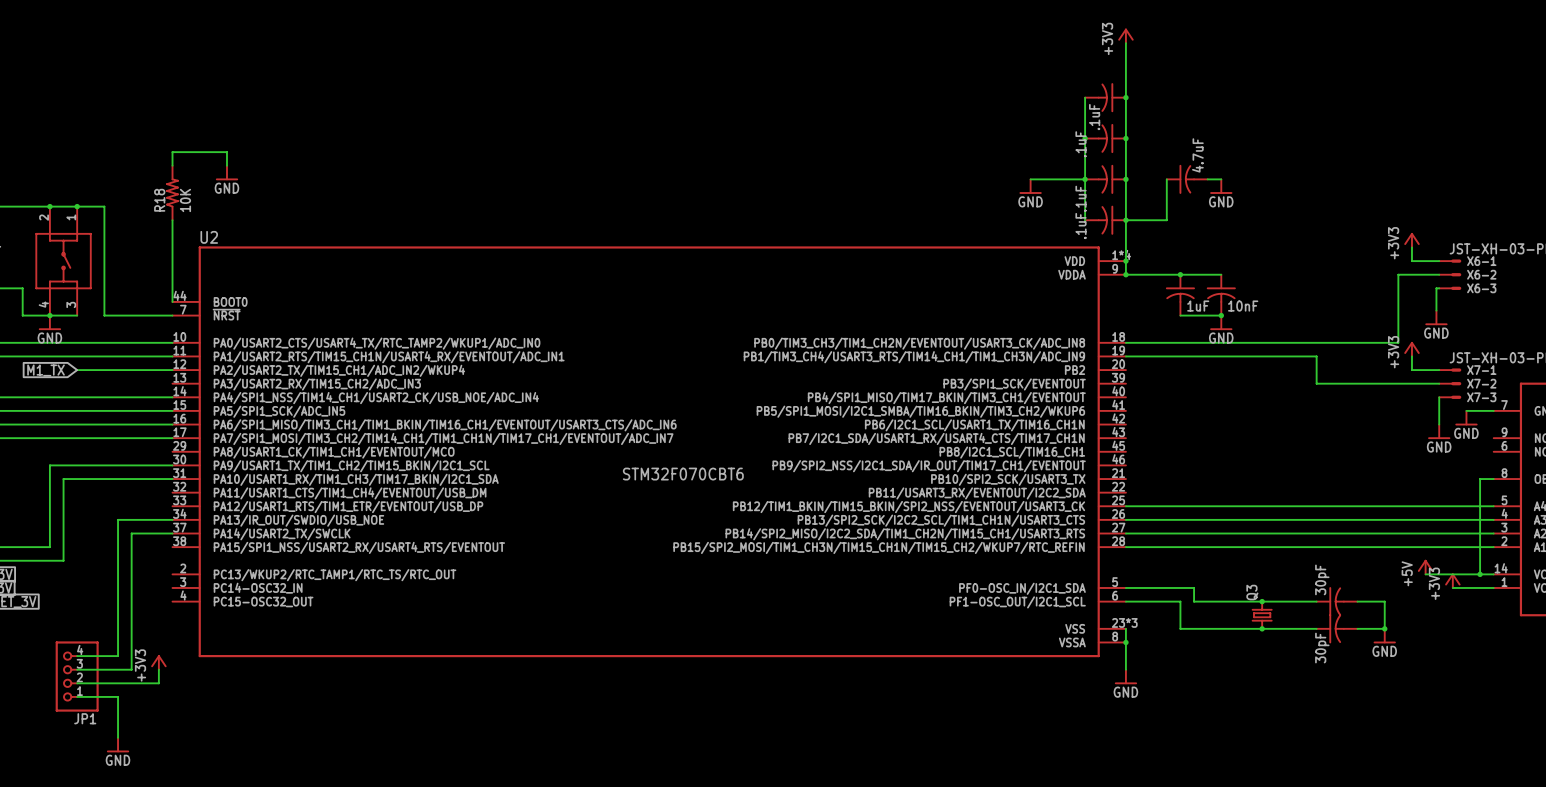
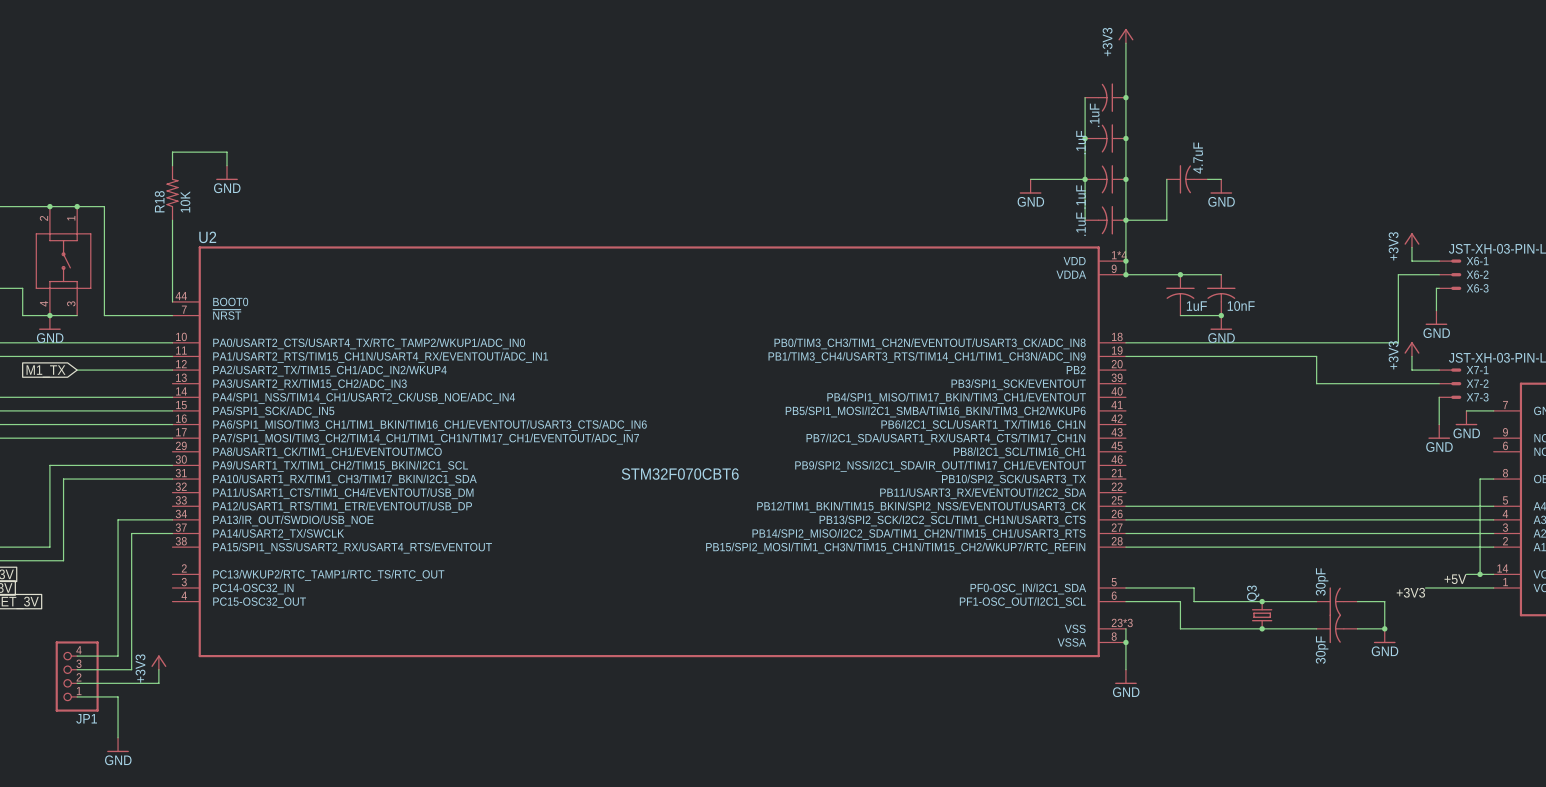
power symbol: +5V (1425, 567) -> none
wire: (1425, 574) (1466, 574) -> none
label: none -> +5V (1455, 579)
power symbol: +3V3 (1452, 580) -> none
wire: none -> (1425, 587) (1452, 587)
label: none -> +3V3 (1410, 592)

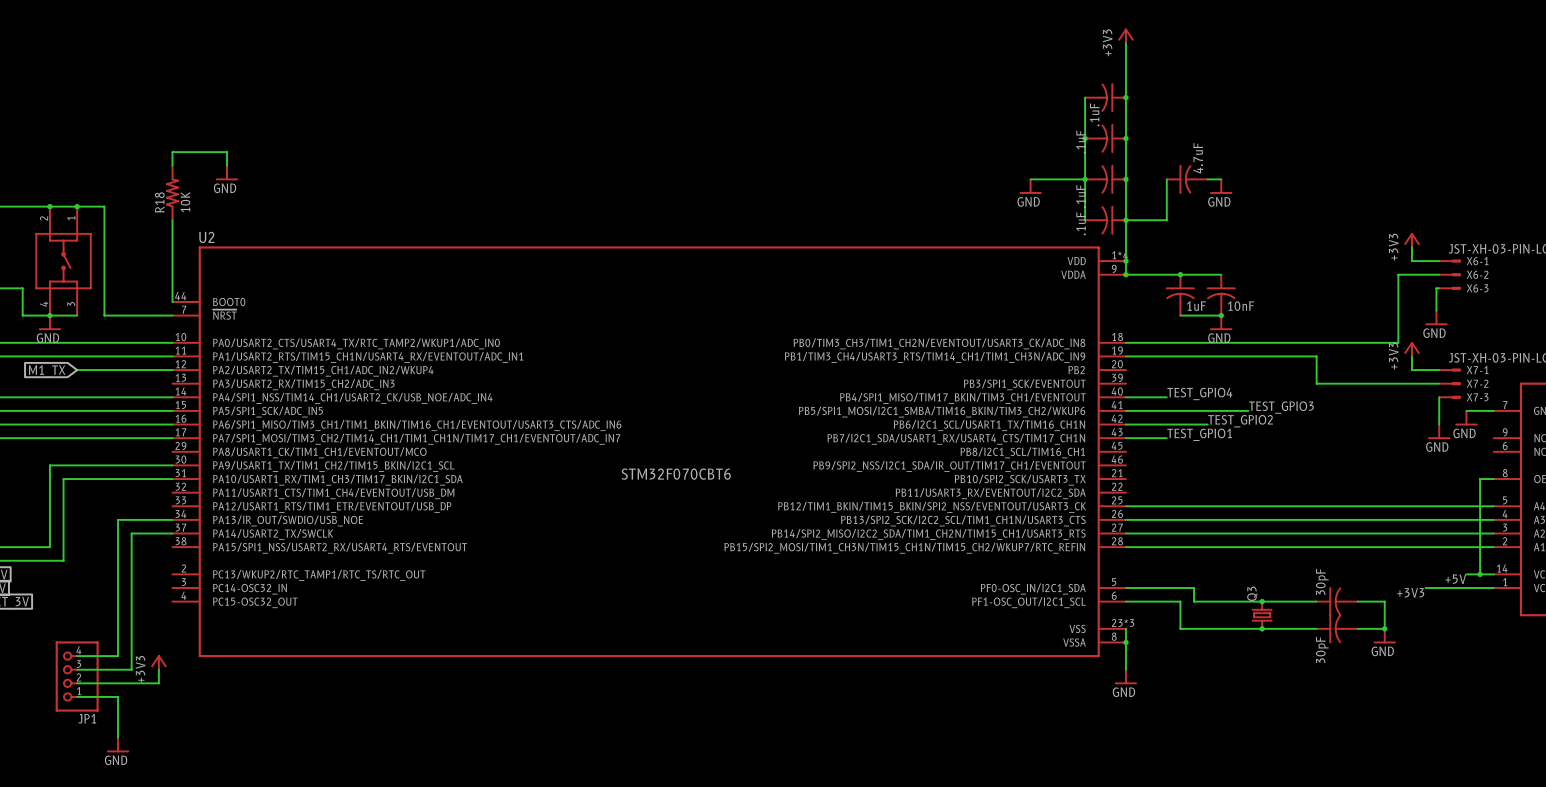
label: none -> TEST_GPIO4 (1199, 393)
wire: none -> (1125, 397) (1166, 397)
label: none -> TEST_GPIO3 (1281, 407)
wire: none -> (1125, 410) (1248, 410)
label: none -> TEST_GPIO2 (1240, 421)
wire: none -> (1125, 424) (1207, 424)
label: none -> TEST_GPIO1 (1199, 434)
wire: none -> (1125, 438) (1166, 438)

